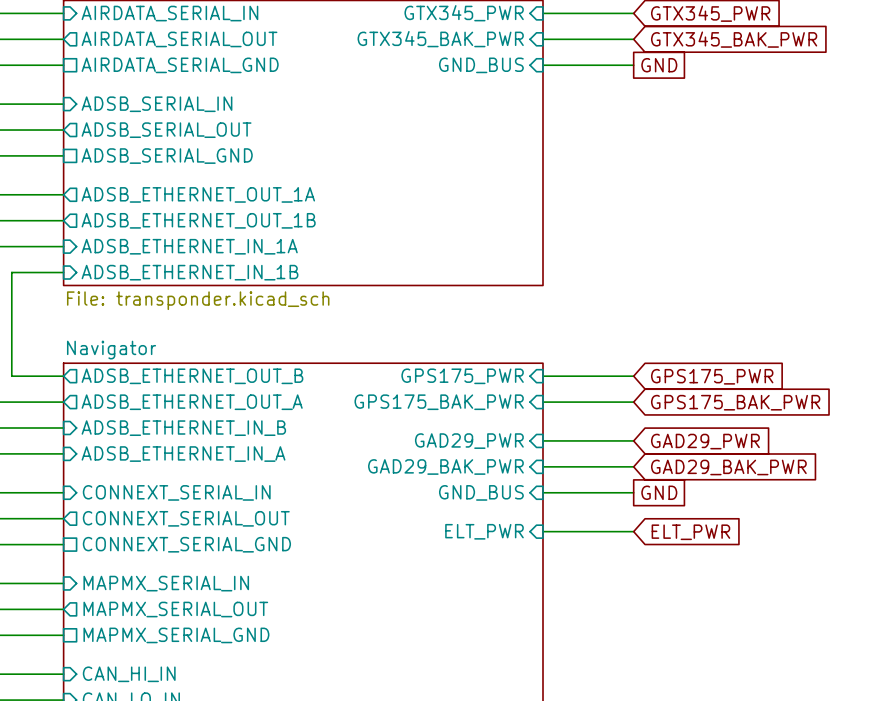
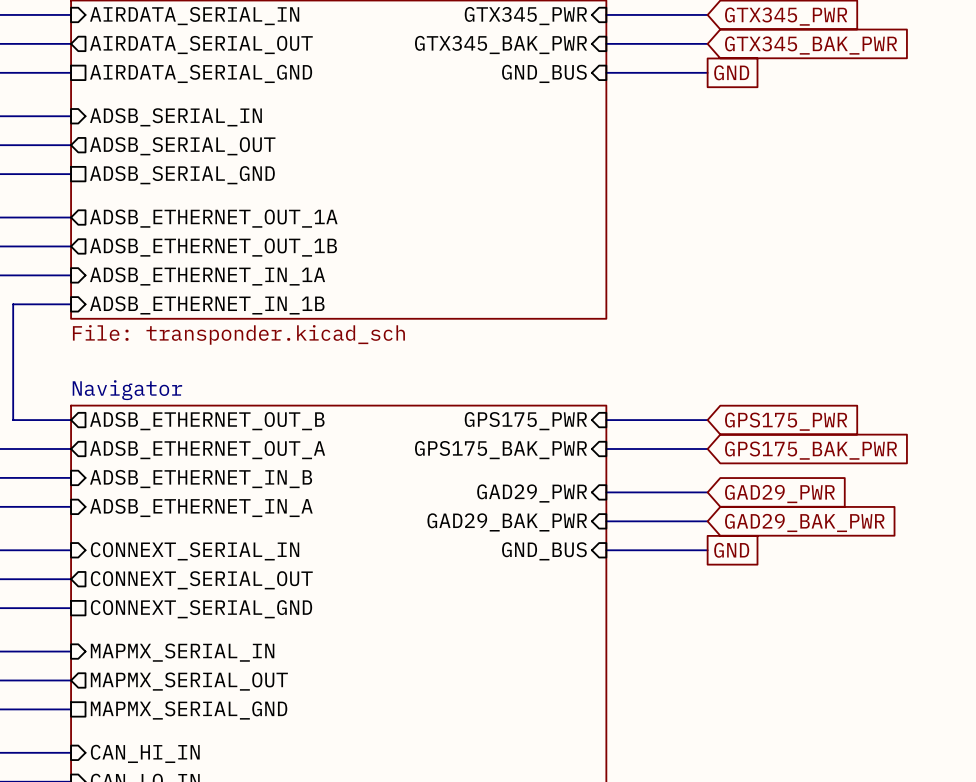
sheet pin: ELT_PWR (484, 531) -> none
wire: (543, 531) (633, 531) -> none
global label: ELT_PWR (690, 532) -> none

